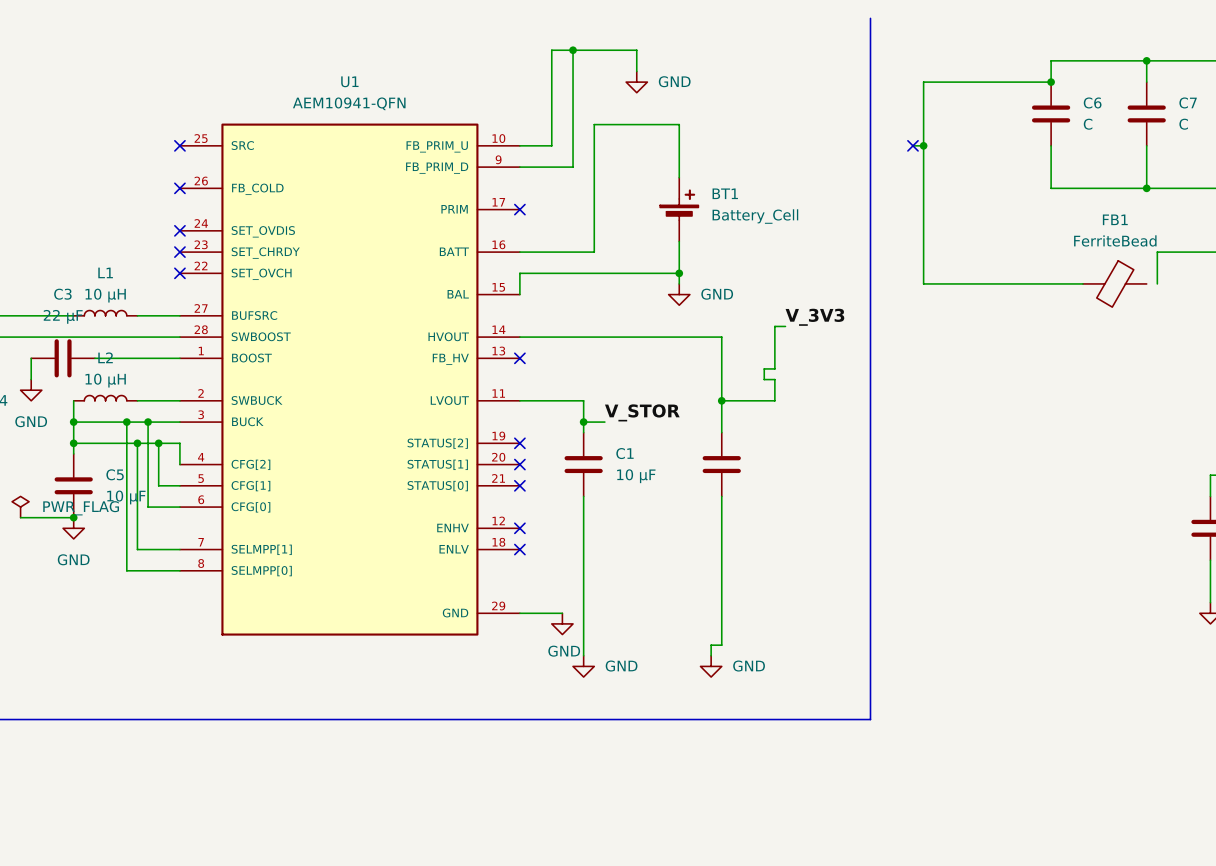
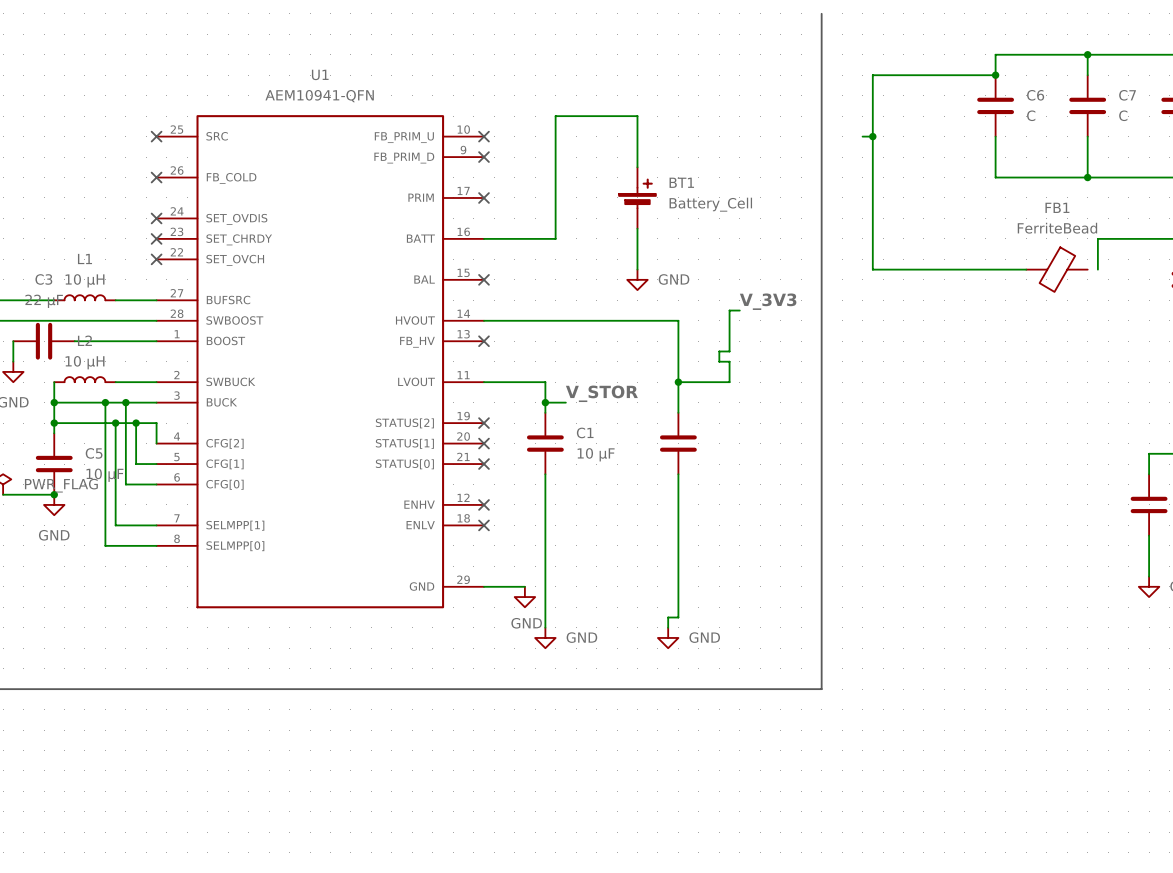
wire: (573, 50) (573, 167) (519, 167) -> none
junction: (573, 50) -> none
wire: (636, 71) (636, 50) (551, 50) (551, 145) (519, 145) -> none
power symbol: GND (636, 82) -> none
no-connect mark: none -> (484, 136)
no-connect mark: (912, 145) -> none
no-connect mark: none -> (484, 157)
wire: (679, 273) (519, 273) (519, 294) -> none
junction: (679, 273) -> none
no-connect mark: none -> (484, 279)

